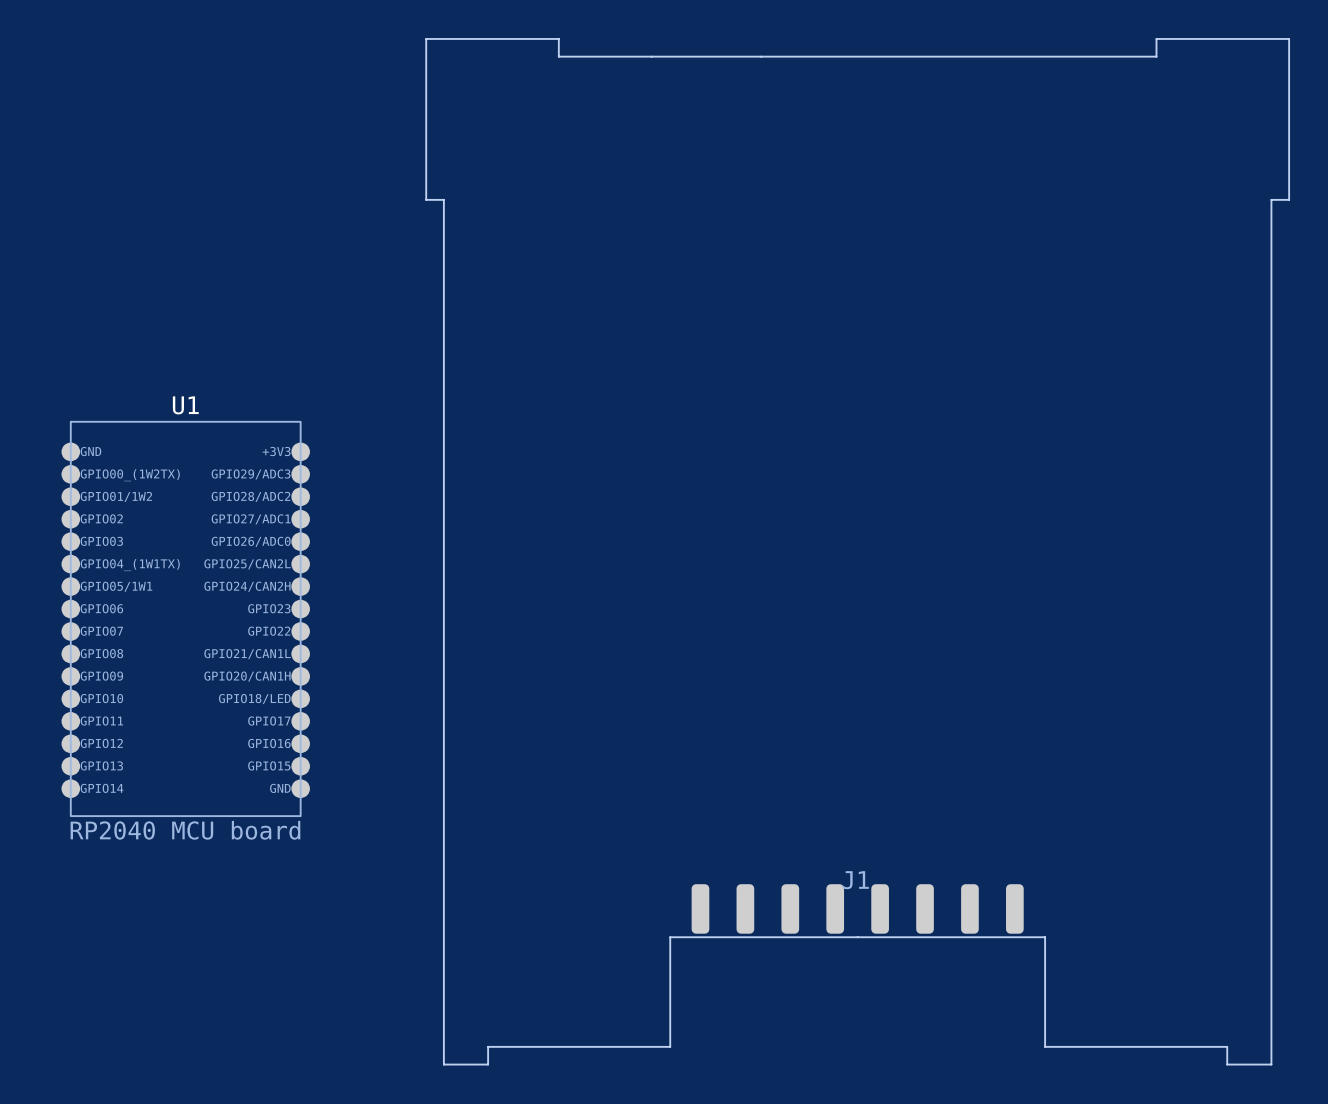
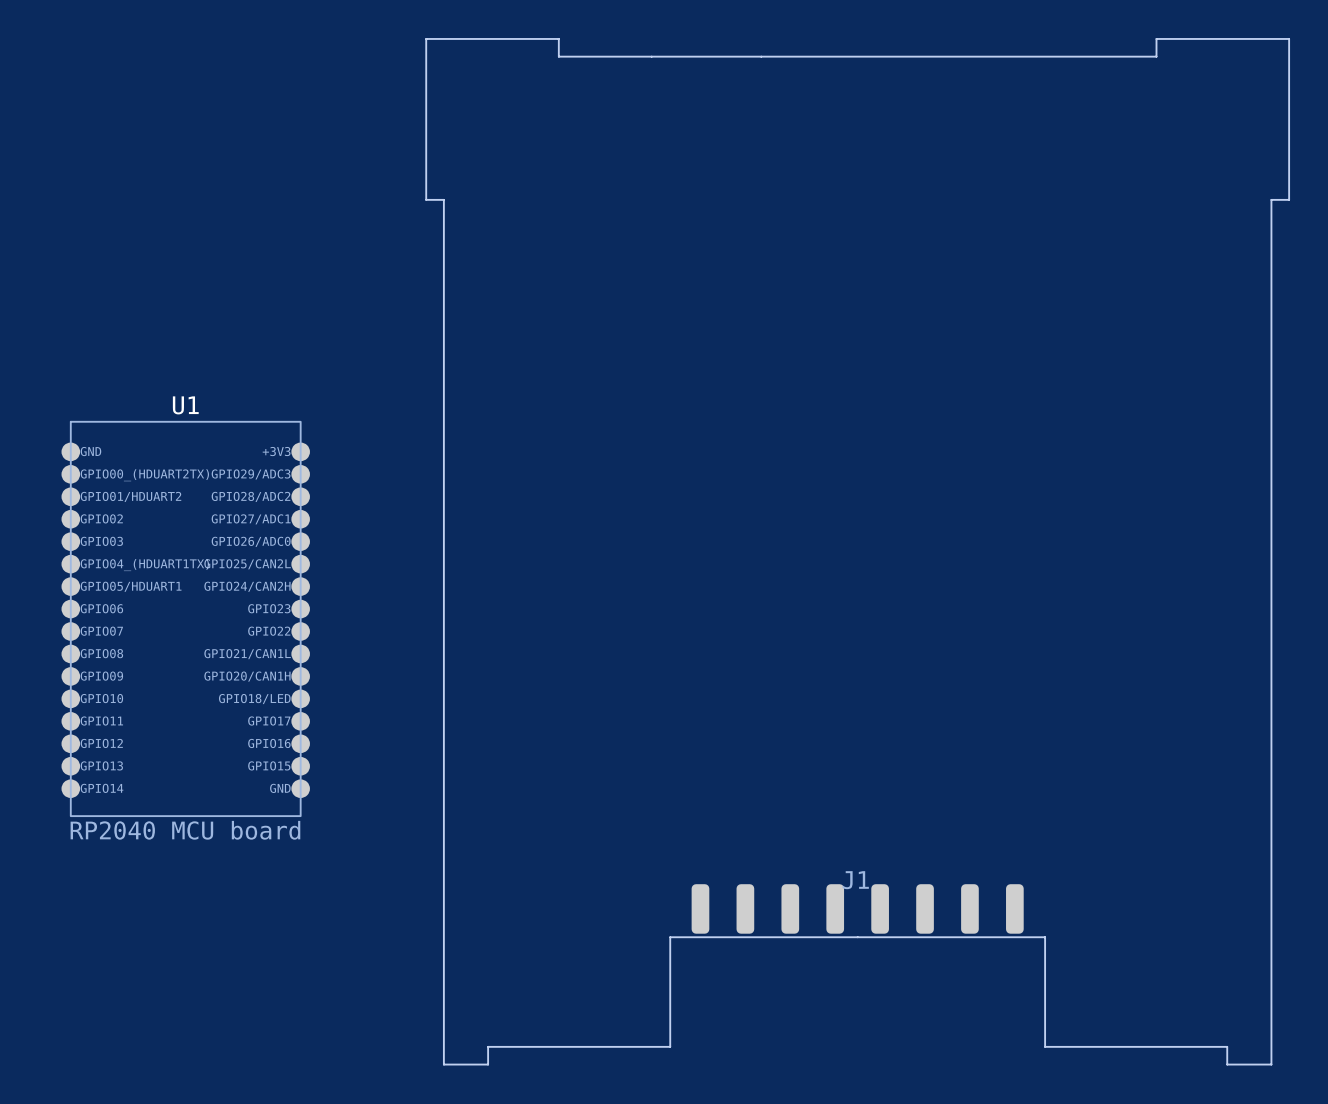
U1 text: GPIO00_(1W2TX) (130, 475) -> GPIO00_(HDUART2TX) (144, 475)
U1 text: GPIO01/1W2 (116, 496) -> GPIO01/HDUART2 (130, 496)
U1 text: GPIO04_(1W1TX) (130, 565) -> GPIO04_(HDUART1TX) (144, 565)
U1 text: GPIO05/1W1 (116, 586) -> GPIO05/HDUART1 (131, 586)

